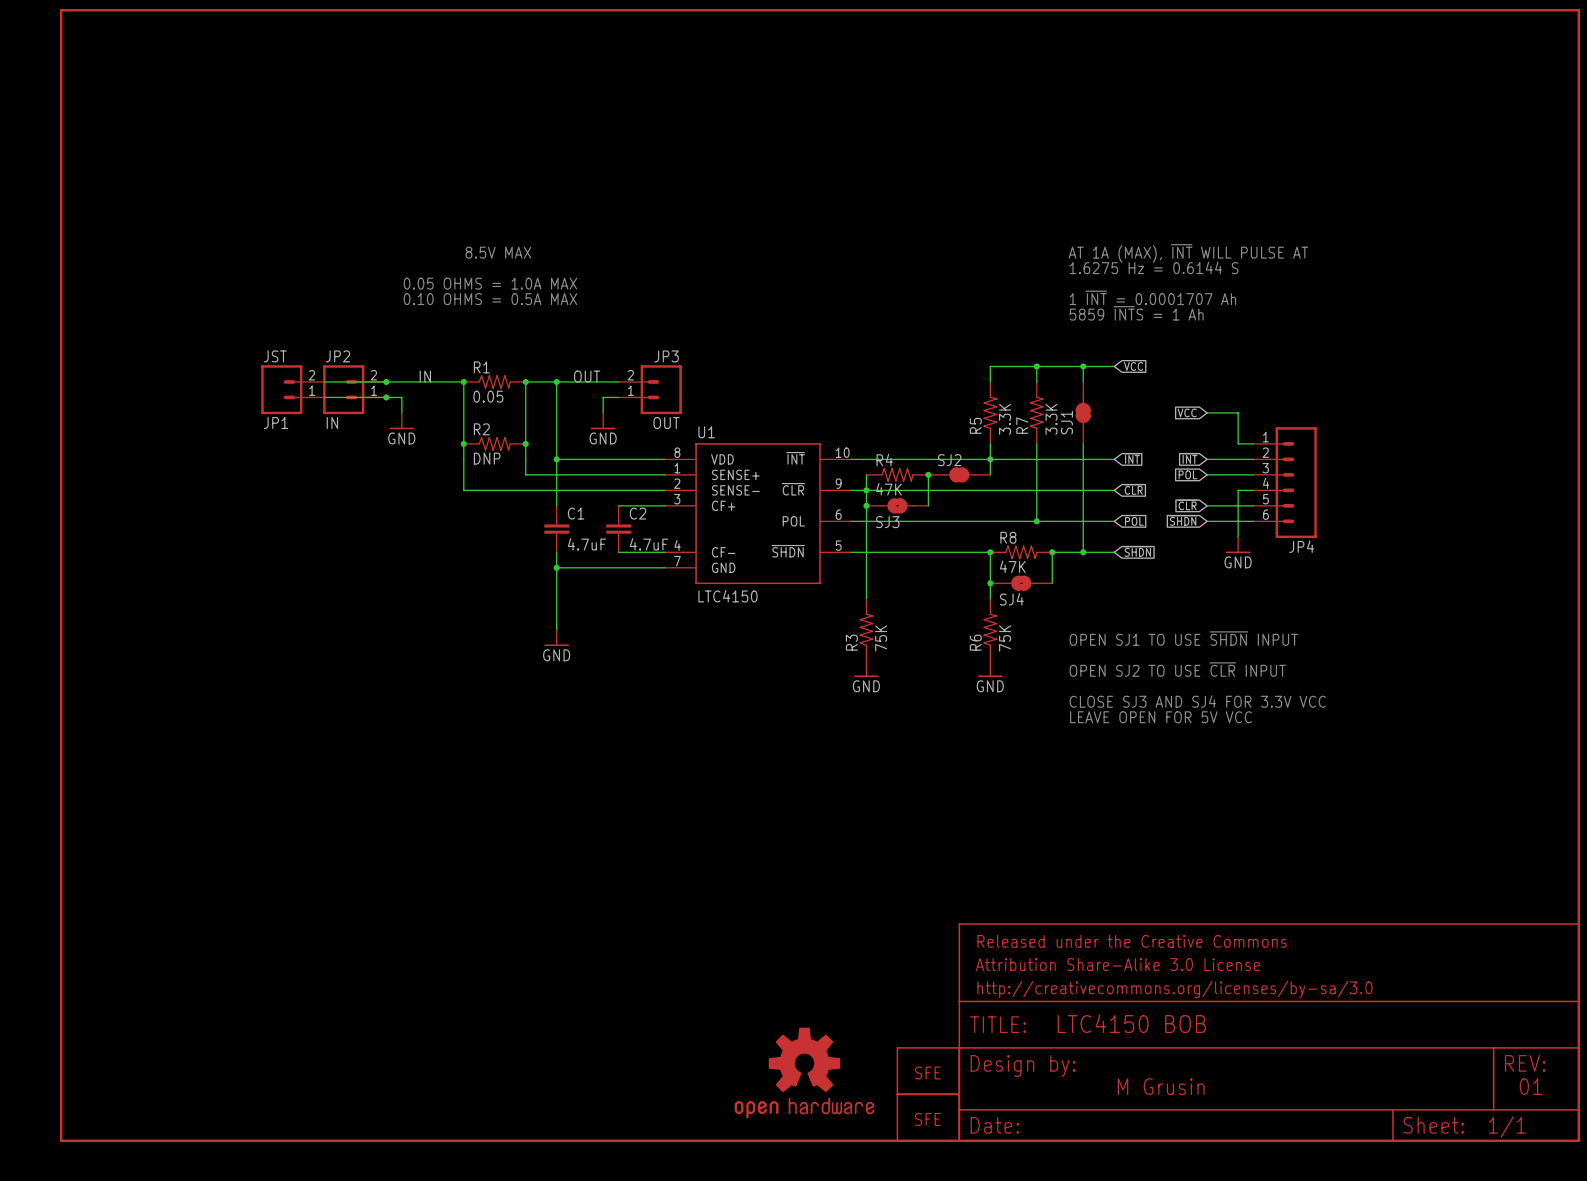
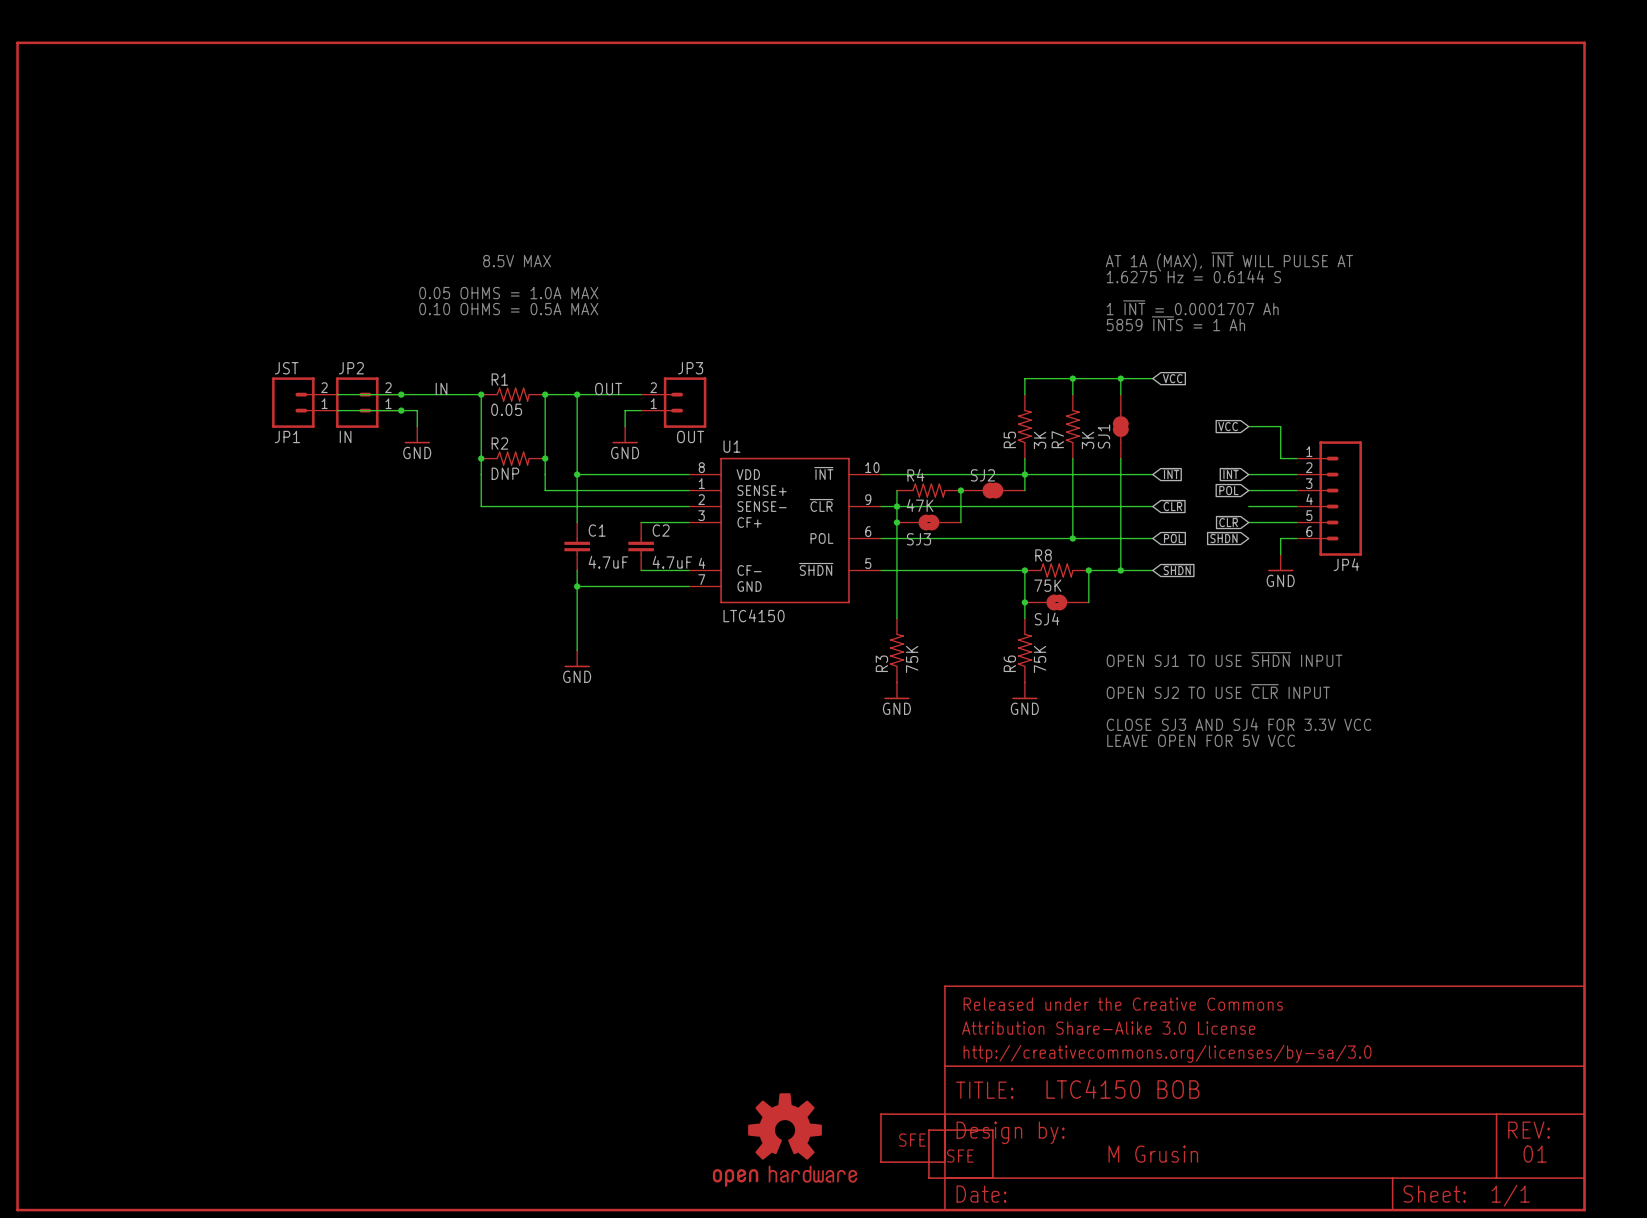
R5 value: 3.3K (1005, 419) -> 3K (1040, 440)
R7 value: 3.3K (1051, 419) -> 3K (1088, 440)
wire: (1238, 490) (1238, 521) (1207, 521) -> (1280, 506) (1248, 506)
R8 value: 47K (1012, 566) -> 75K (1047, 585)
part position: (819, 575) -> (801, 626)
part position: (1269, 1032) -> (1264, 1098)
part position: (928, 1071) -> (912, 1138)
part position: (804, 1072) -> (784, 1140)
text position: M Grusin (1161, 1086) -> M Grusin (1153, 1154)
text position: 01 (1530, 1086) -> 01 (1535, 1154)

